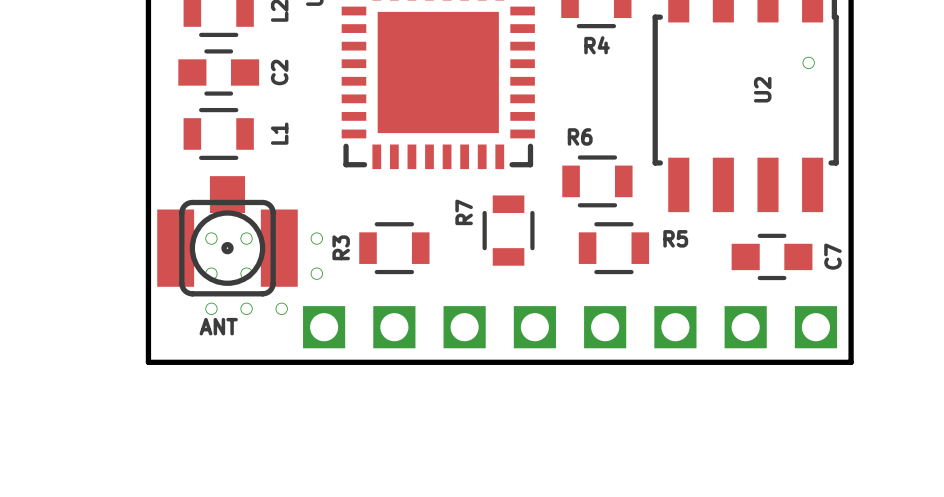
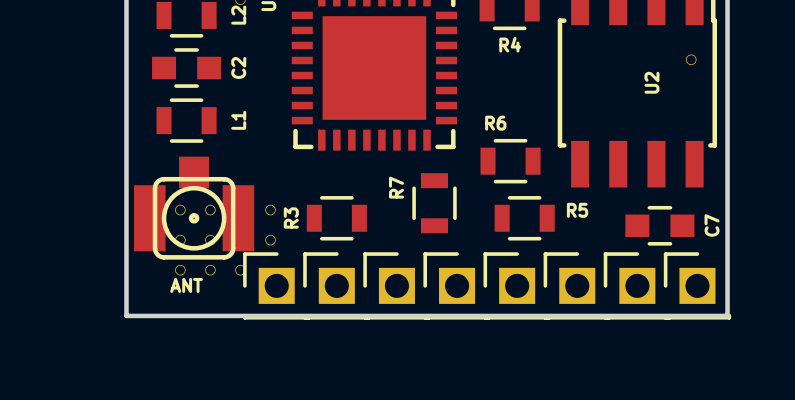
part footprint: [303, 306, 346, 349] -> [243, 252, 311, 320]
part footprint: [373, 306, 416, 349] -> [303, 252, 371, 320]
part footprint: [443, 306, 486, 349] -> [363, 252, 431, 320]
part footprint: [513, 306, 556, 349] -> [423, 252, 491, 320]
part footprint: [584, 306, 627, 349] -> [483, 252, 551, 320]
part footprint: [654, 306, 697, 349] -> [543, 252, 611, 320]
part footprint: [724, 306, 767, 349] -> [603, 252, 672, 320]
part footprint: [794, 306, 838, 349] -> [663, 252, 732, 320]

